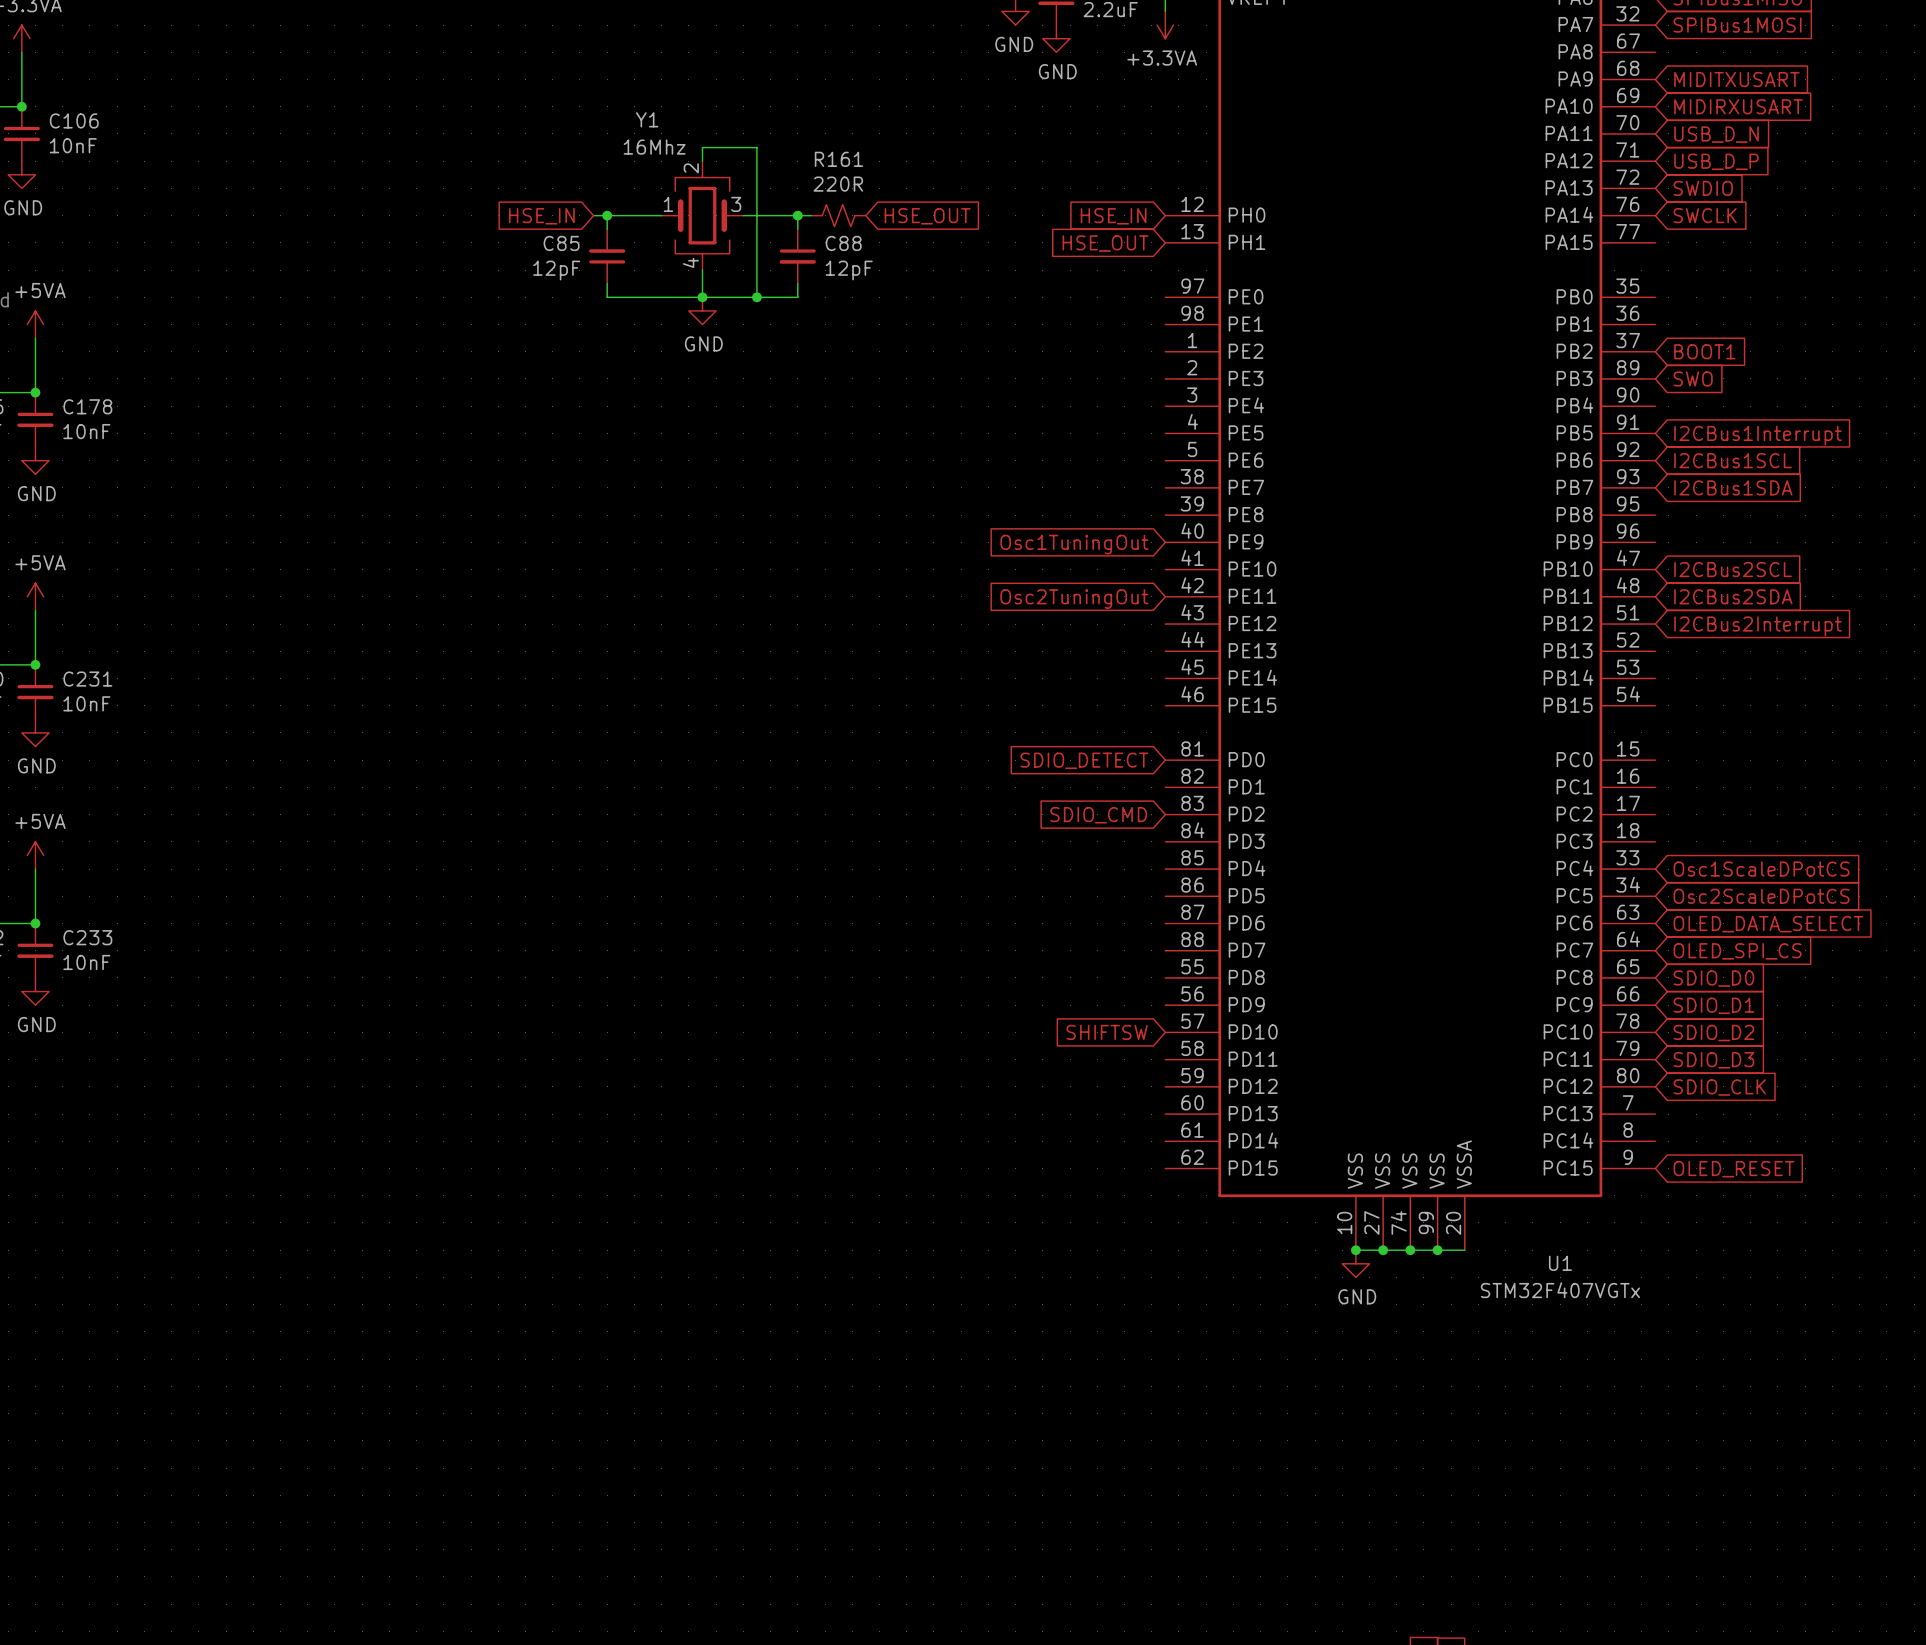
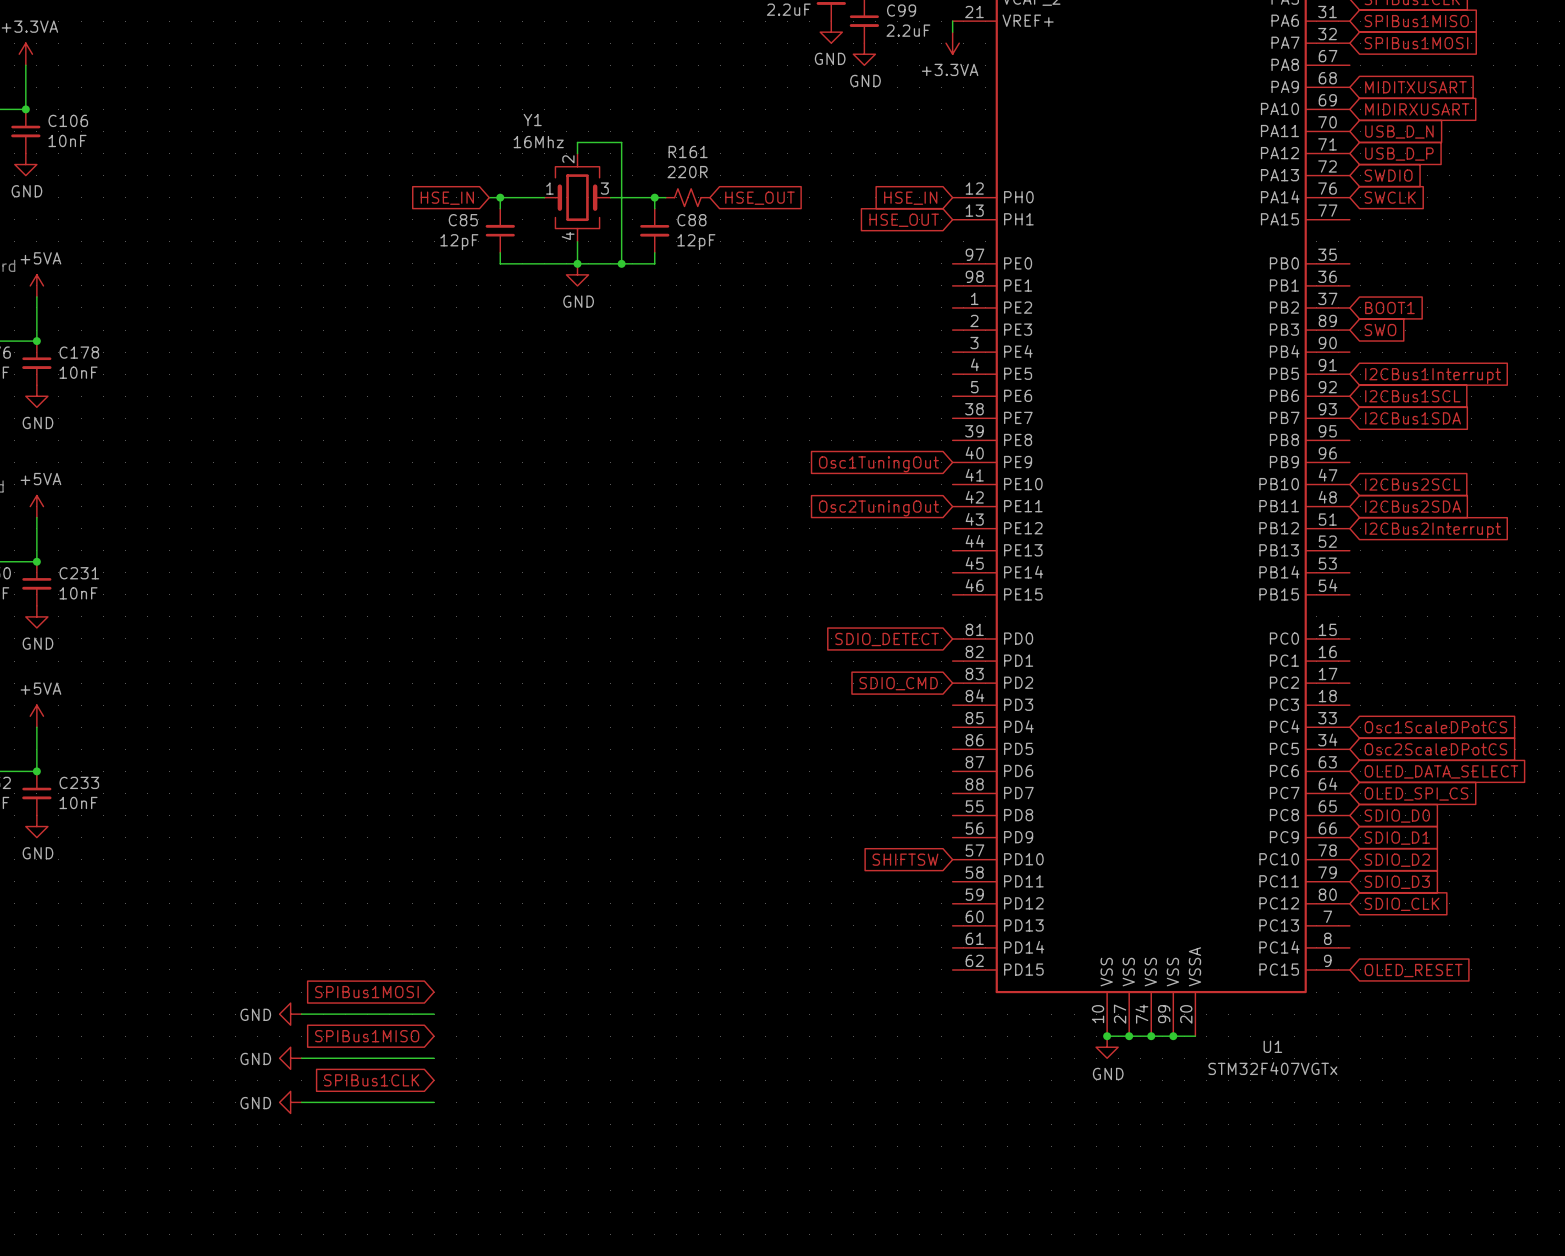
global label: none -> SPIBus1MOSI (366, 992)
power symbol: none -> GND (290, 1014)
wire: none -> (301, 1014) (434, 1014)
global label: none -> SPIBus1MISO (367, 1036)
power symbol: none -> GND (290, 1058)
wire: none -> (301, 1058) (434, 1058)
global label: none -> SPIBus1CLK (371, 1080)
power symbol: none -> GND (290, 1102)
wire: none -> (301, 1102) (434, 1102)

